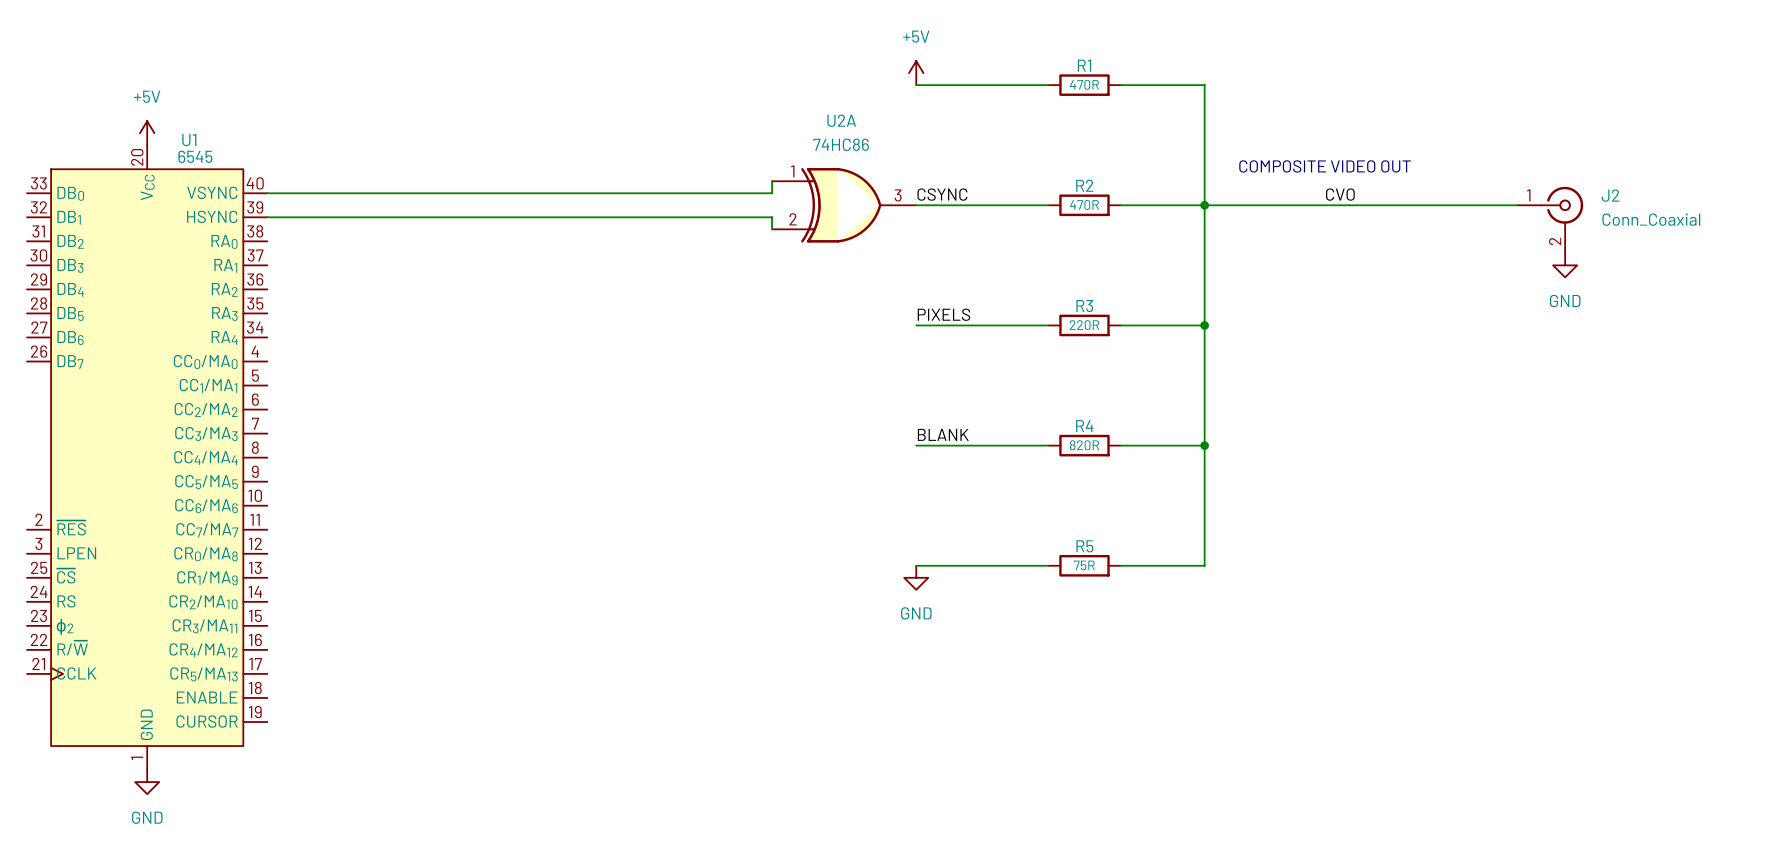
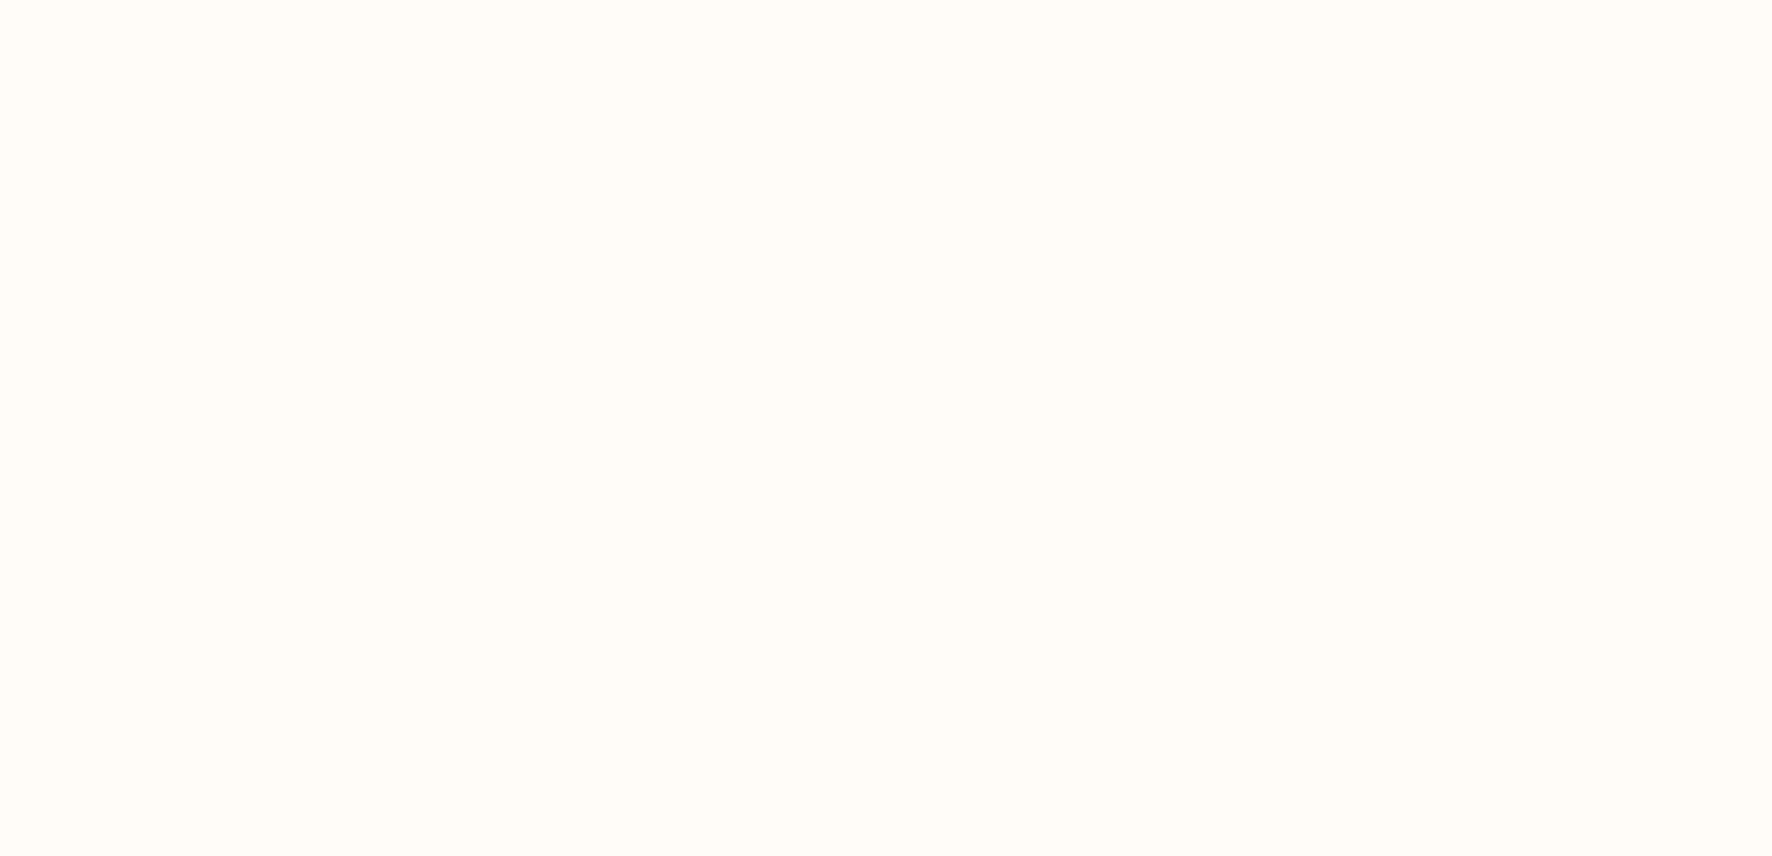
power symbol: +5V (916, 73) -> none
wire: (916, 85) (1048, 85) -> none
R1: 470R (1084, 85) -> none
wire: (1120, 85) (1204, 85) (1204, 565) (1120, 565) -> none
power symbol: +5V (147, 133) -> none
text: COMPOSITE VIDEO OUT (1325, 166) -> none
wire: (772, 181) (772, 193) (267, 193) -> none
label: CSYNC (942, 194) -> none
label: CVO (1340, 194) -> none
U2A: 74HC86 (844, 205) -> none
wire: (916, 205) (1048, 205) -> none
R2: 470R (1084, 205) -> none
wire: (1120, 205) (1517, 205) -> none
junction: (1204, 205) -> none
wire: (267, 217) (772, 217) (772, 229) -> none
J2: Conn_Coaxial (1550, 220) -> none
power symbol: GND (1565, 265) -> none
label: PIXELS (943, 314) -> none
wire: (916, 325) (1048, 325) -> none
R3: 220R (1084, 325) -> none
wire: (1120, 325) (1204, 325) -> none
junction: (1204, 325) -> none
label: BLANK (943, 434) -> none
wire: (916, 445) (1048, 445) -> none
R4: 820R (1084, 445) -> none
wire: (1120, 445) (1204, 445) -> none
junction: (1204, 445) -> none
U1: 6545 (147, 457) -> none
wire: (916, 565) (1048, 565) -> none
R5: 75R (1084, 565) -> none
power symbol: GND (916, 577) -> none
power symbol: GND (147, 782) -> none

